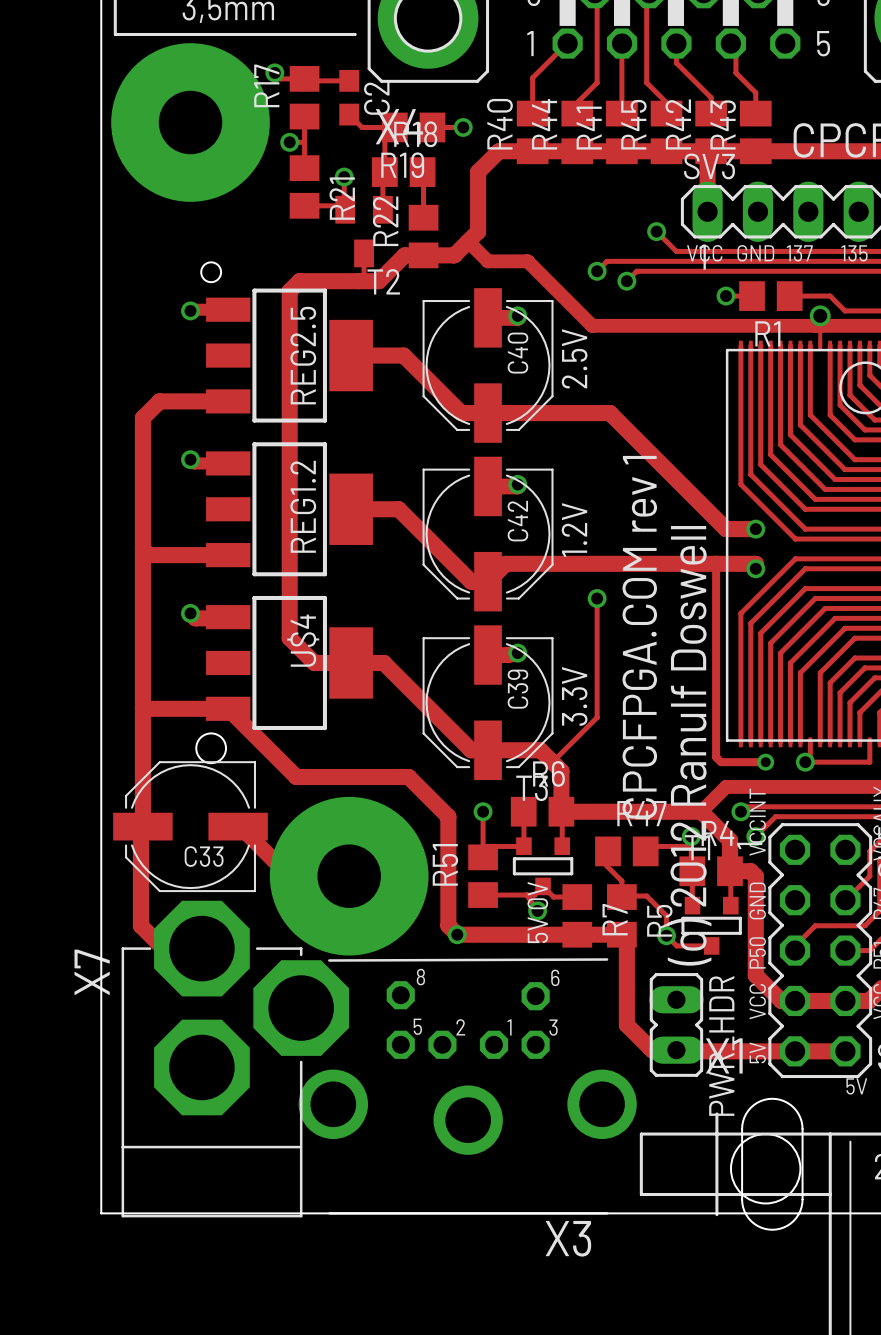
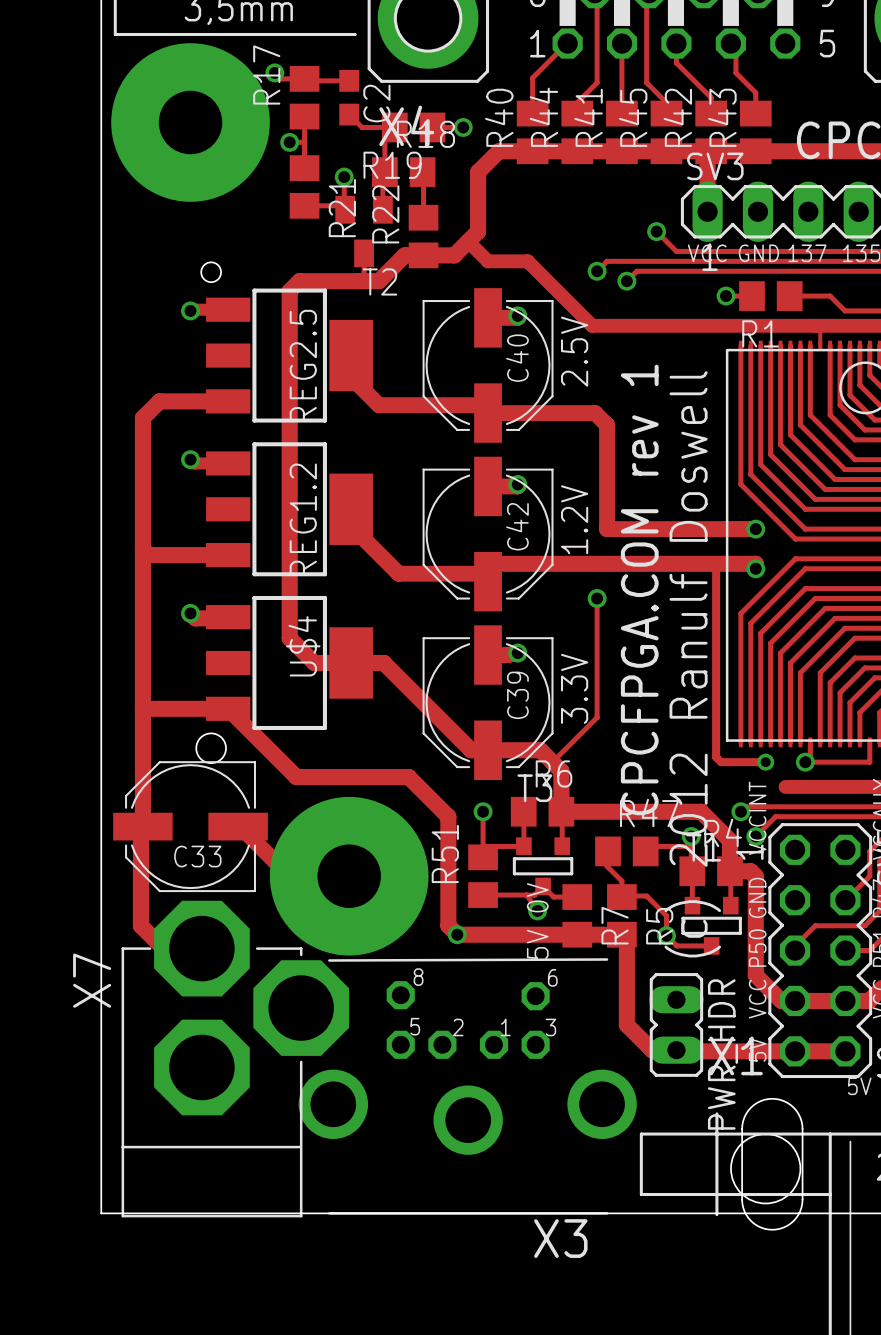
via: (820, 315) -> none
track: (351, 355) (403, 355) (461, 413) (486, 413) -> (351, 355) (351, 377) (378, 405) (478, 405) (488, 415)
track width: thick (486, 413) (595, 413) -> thin (486, 413) (595, 413)
track: (595, 413) (610, 413) (726, 529) -> (595, 413) (607, 424) (607, 529) (726, 529)
track: (351, 509) (398, 509) (471, 581) (488, 581) (505, 563) -> (351, 509) (351, 526) (398, 573) (480, 573) (488, 581) (488, 573) (497, 563) (505, 563)
track: (785, 786) (726, 786) (706, 806) -> none

